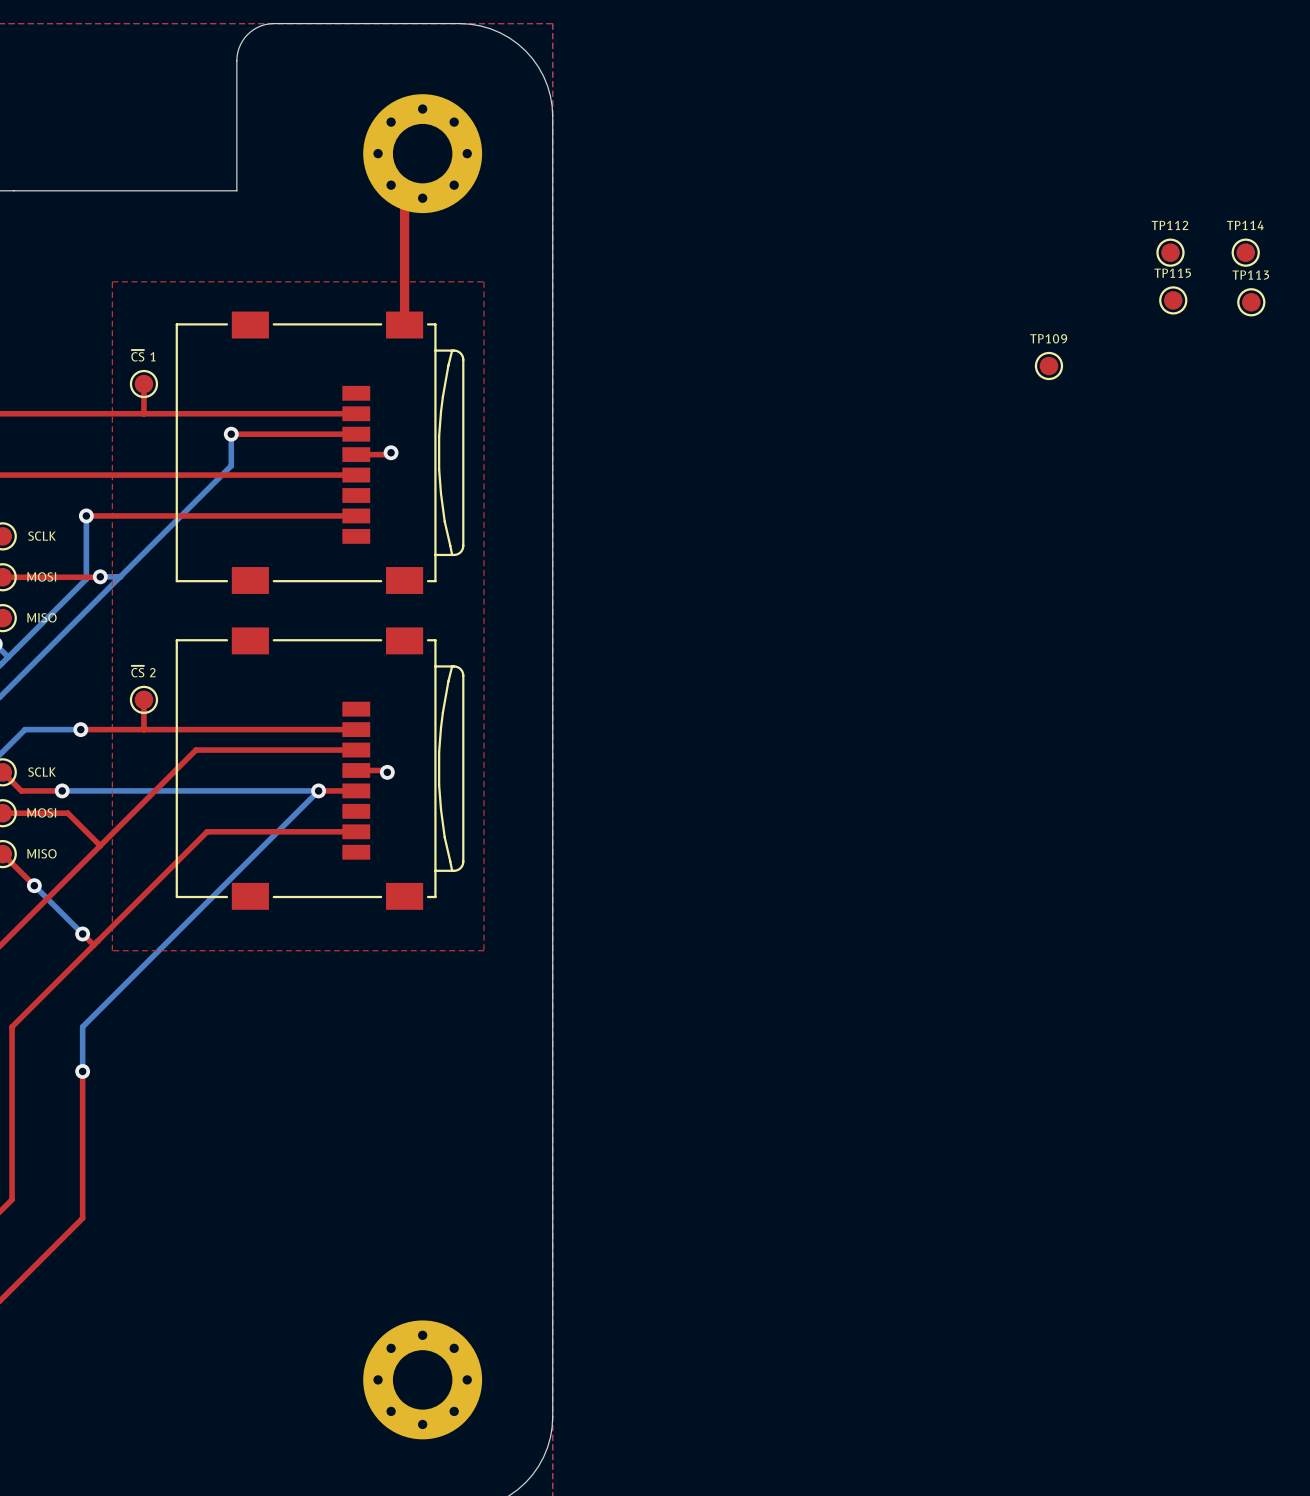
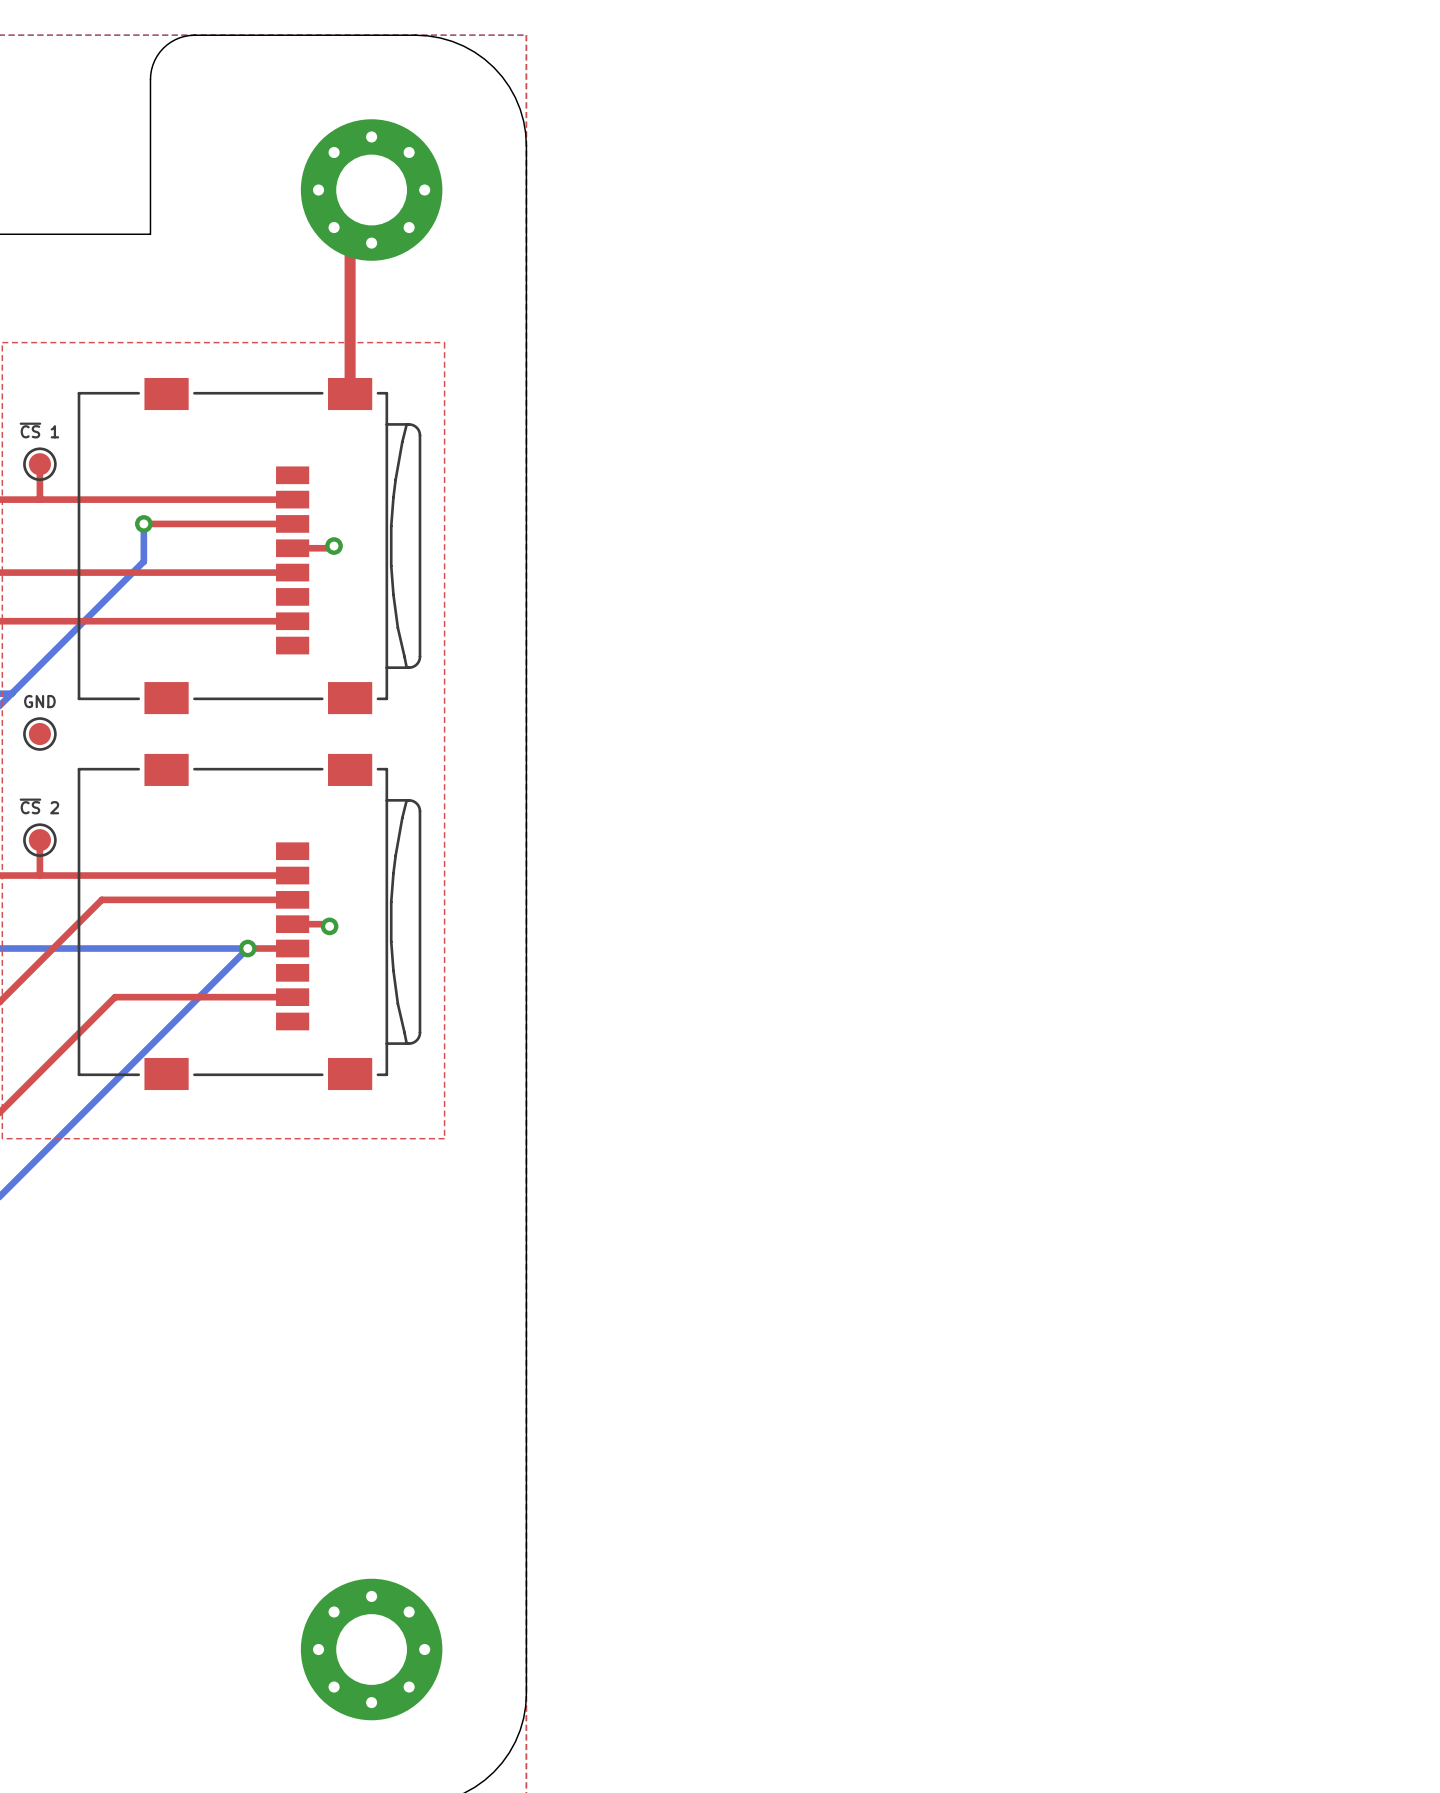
TP112: (1170, 252) -> none
TP114: (1245, 252) -> none
TP115: (1173, 300) -> none
TP113: (1251, 302) -> none
TP109: (1048, 366) -> none
GND: none -> (39, 734)

